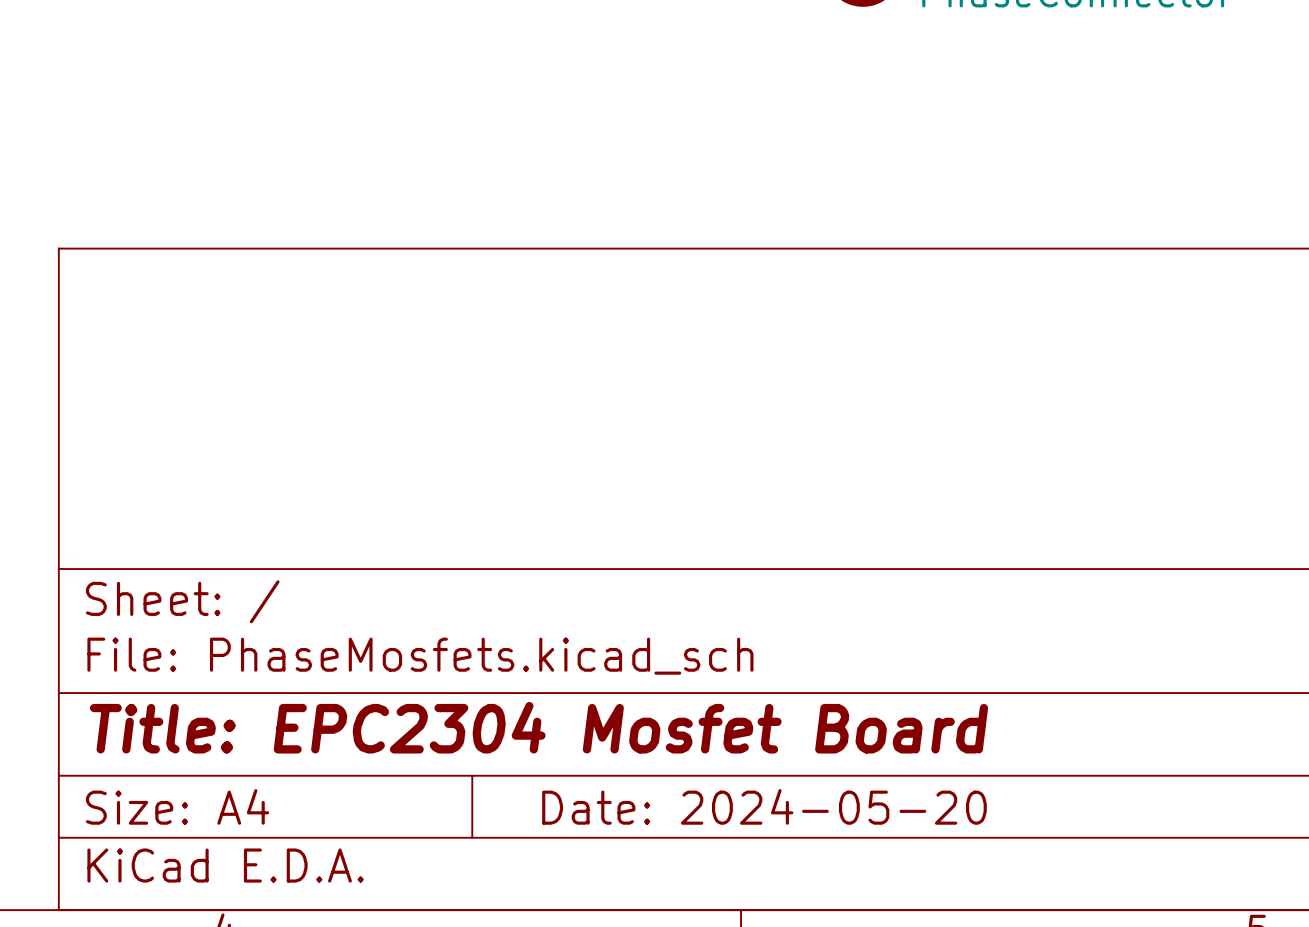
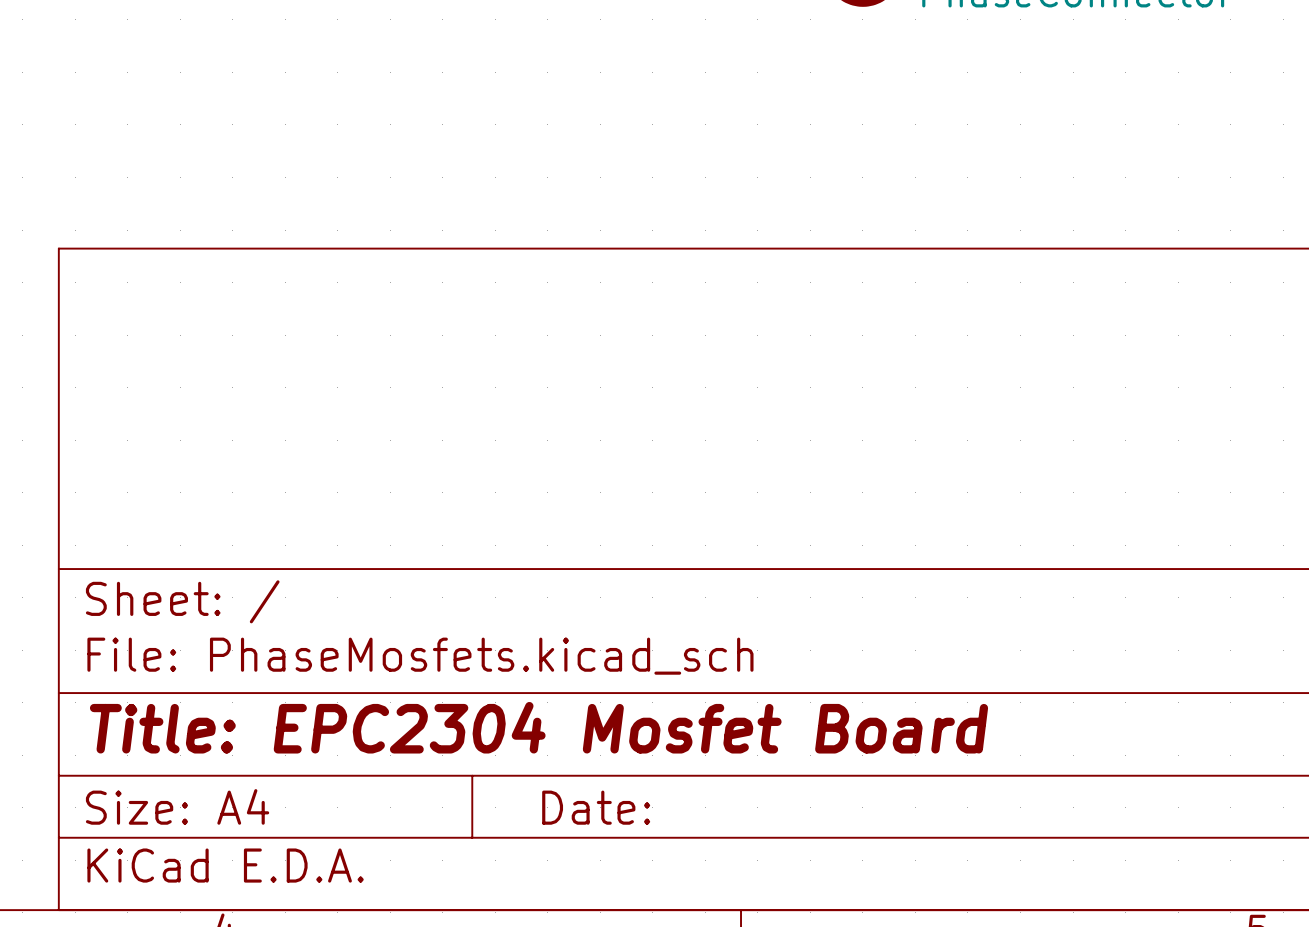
title block: Date: 2024-05-20 (764, 806) -> Date: (596, 807)

